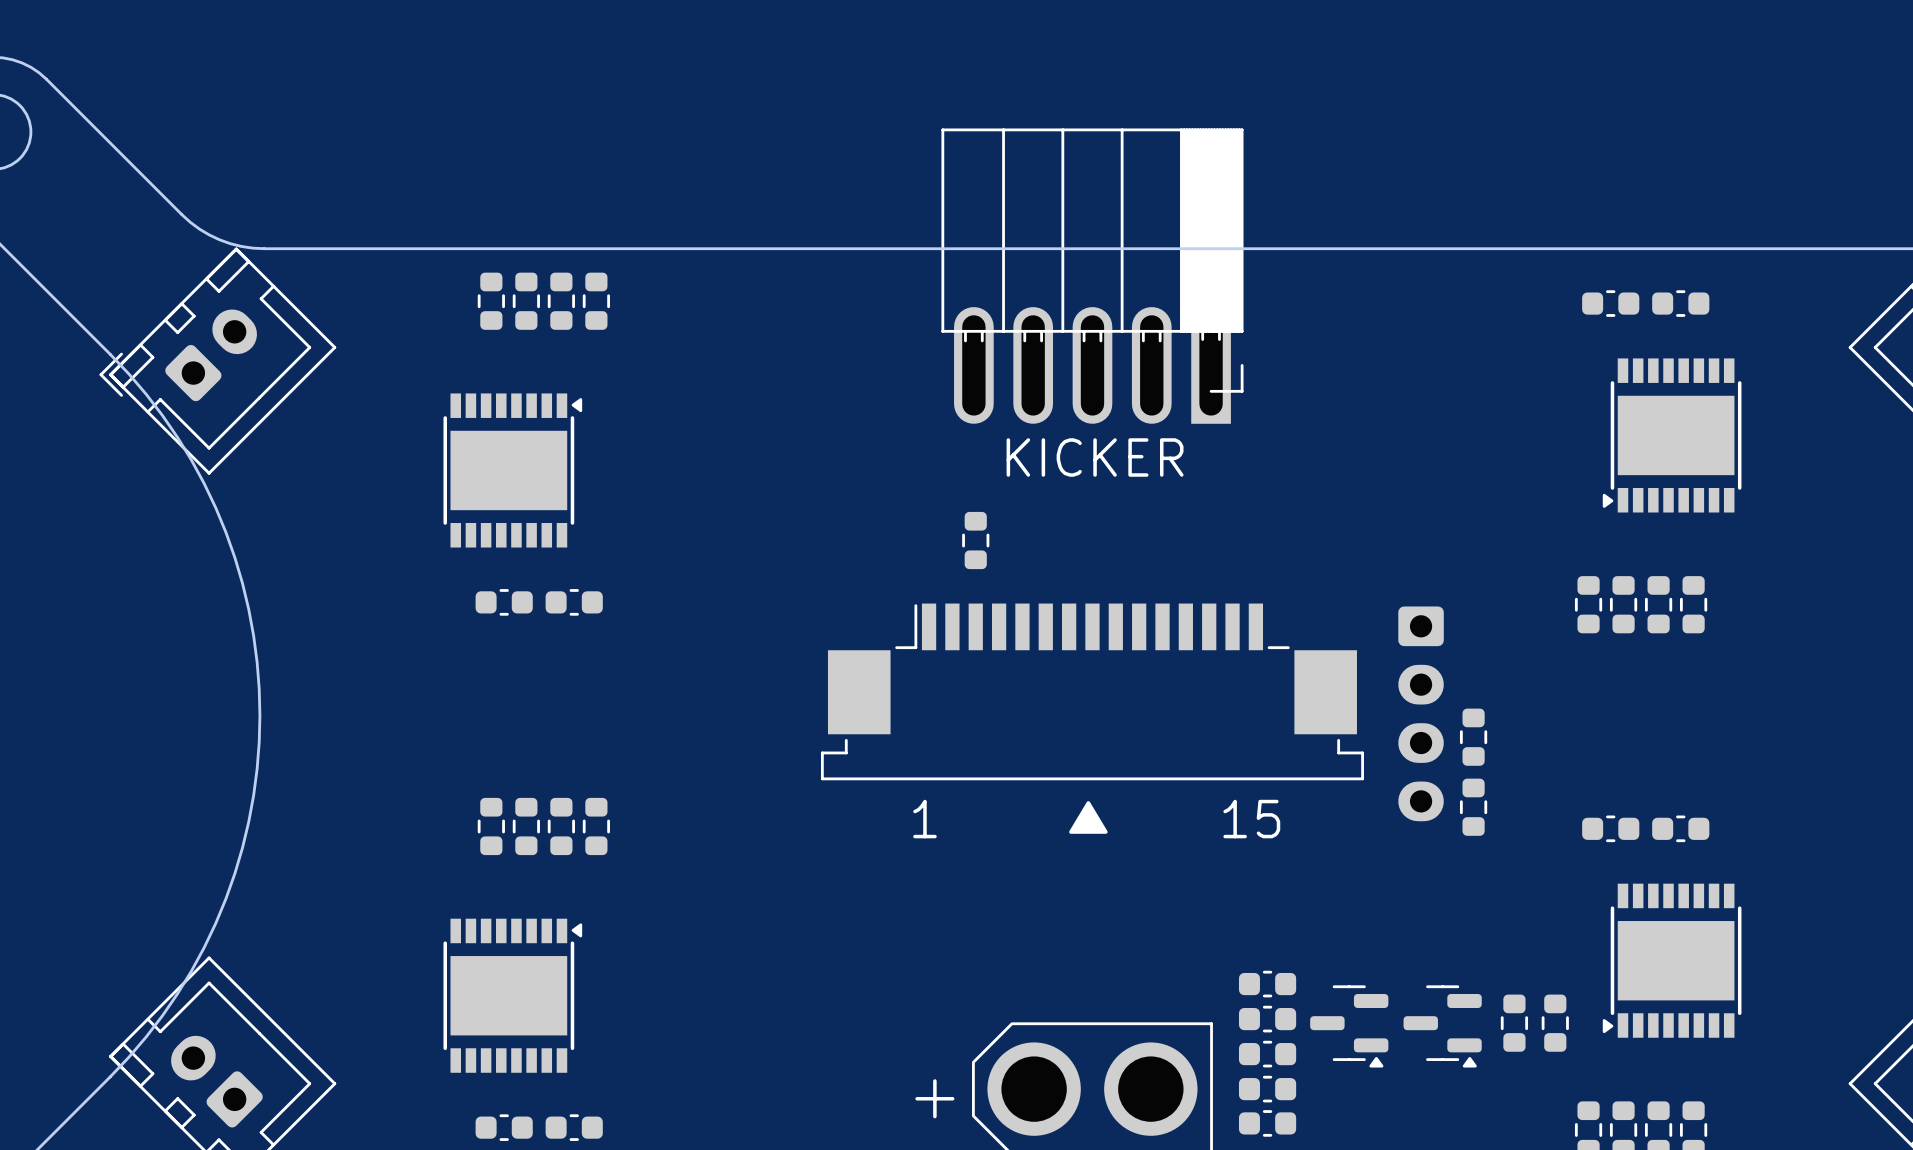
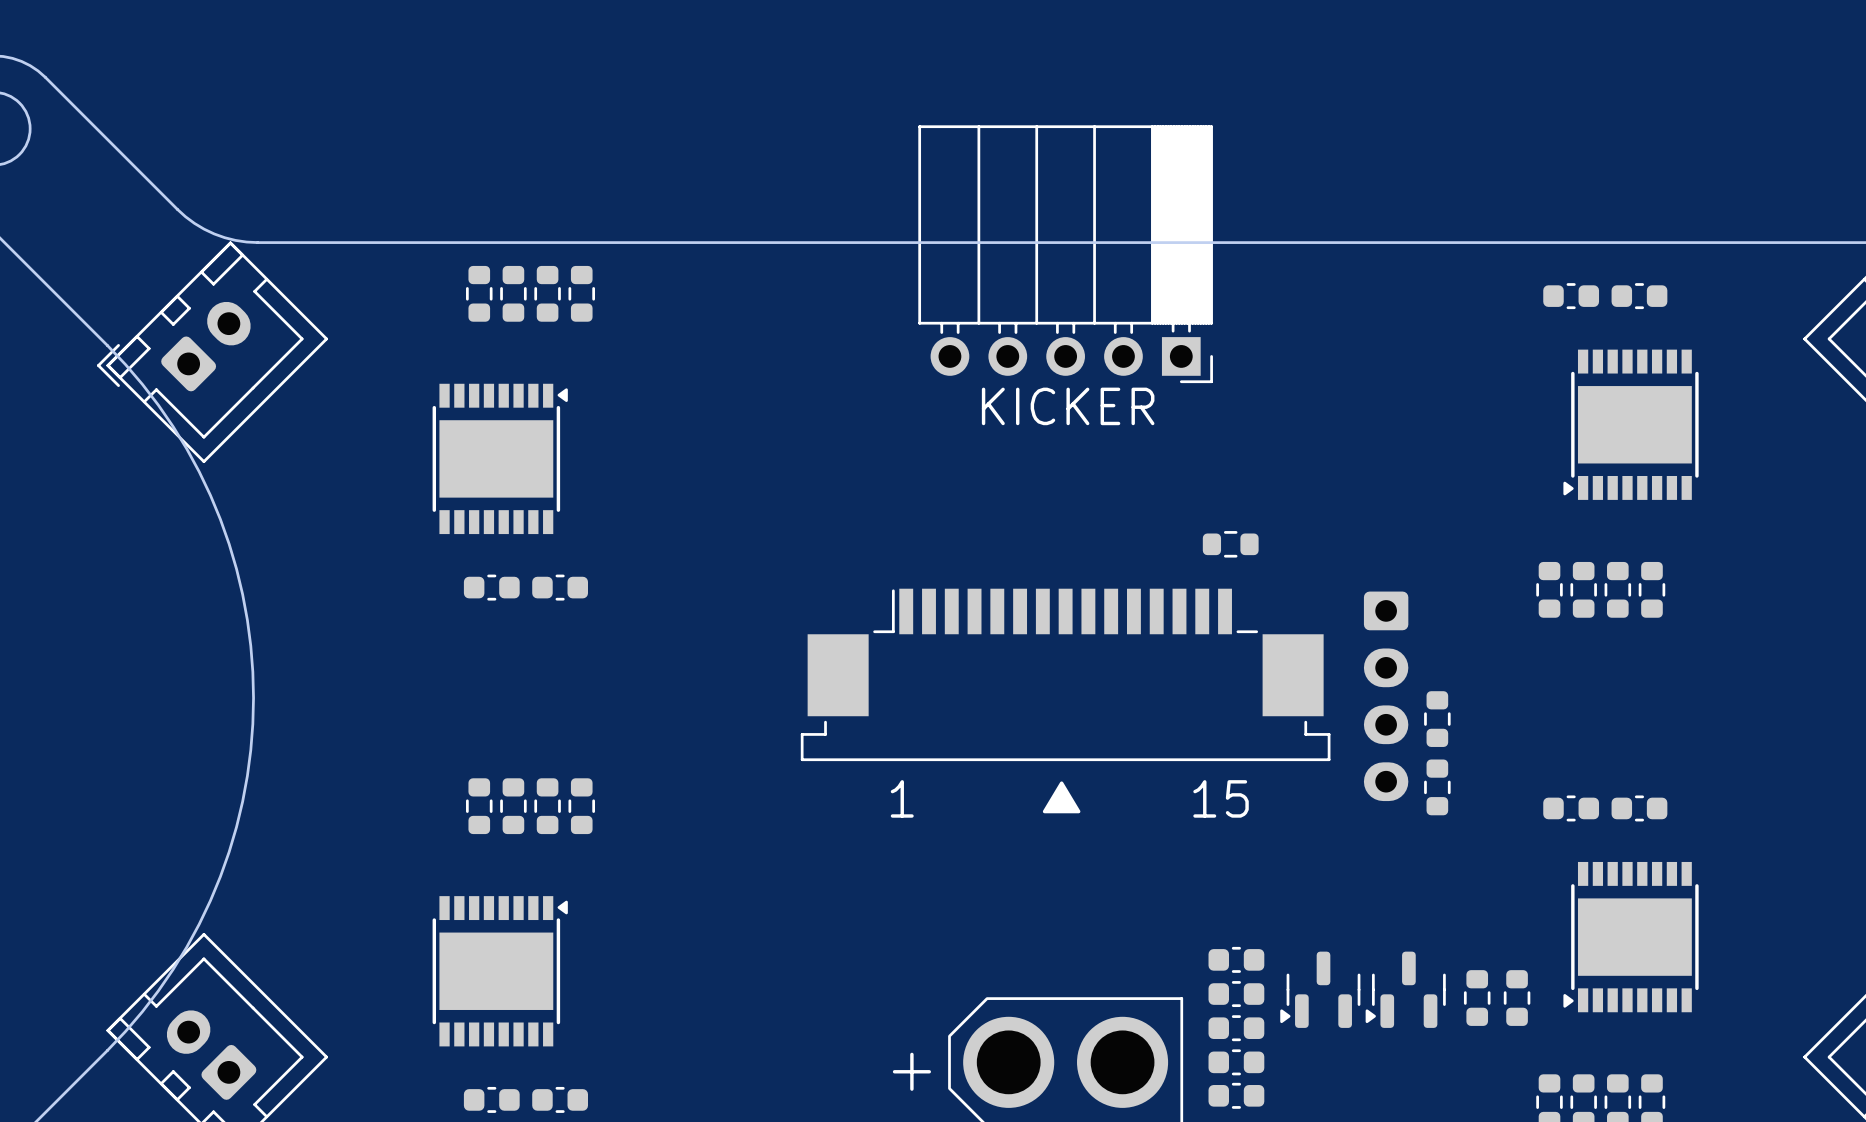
part footprint: [941, 128, 1244, 424] -> [918, 125, 1213, 384]
text position: KICKER (1095, 457) -> KICKER (1068, 406)
part rotation: 0° (975, 540) -> 90° clockwise (1230, 544)
part position: (975, 540) -> (1230, 544)
part rotation: 0° (1349, 1026) -> 90° clockwise (1320, 989)
part rotation: 0° (1442, 1026) -> 90° clockwise (1405, 989)

